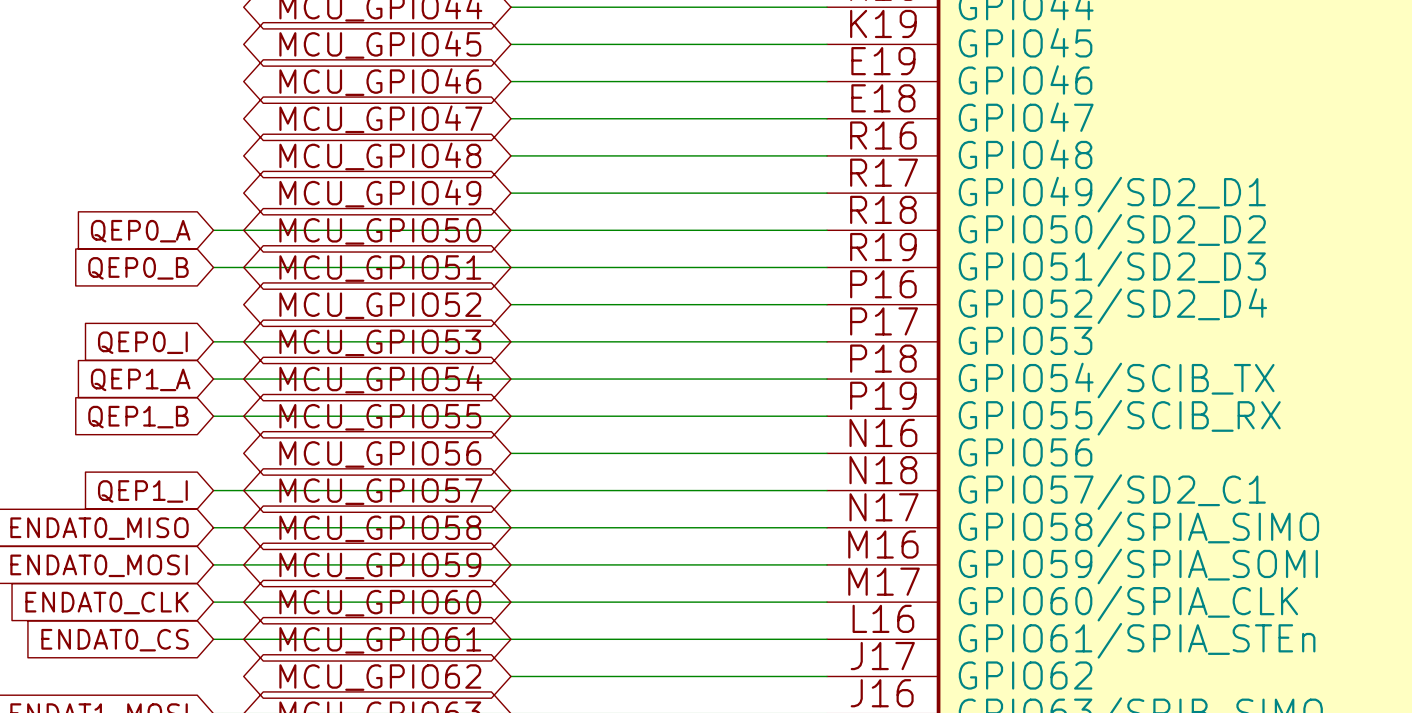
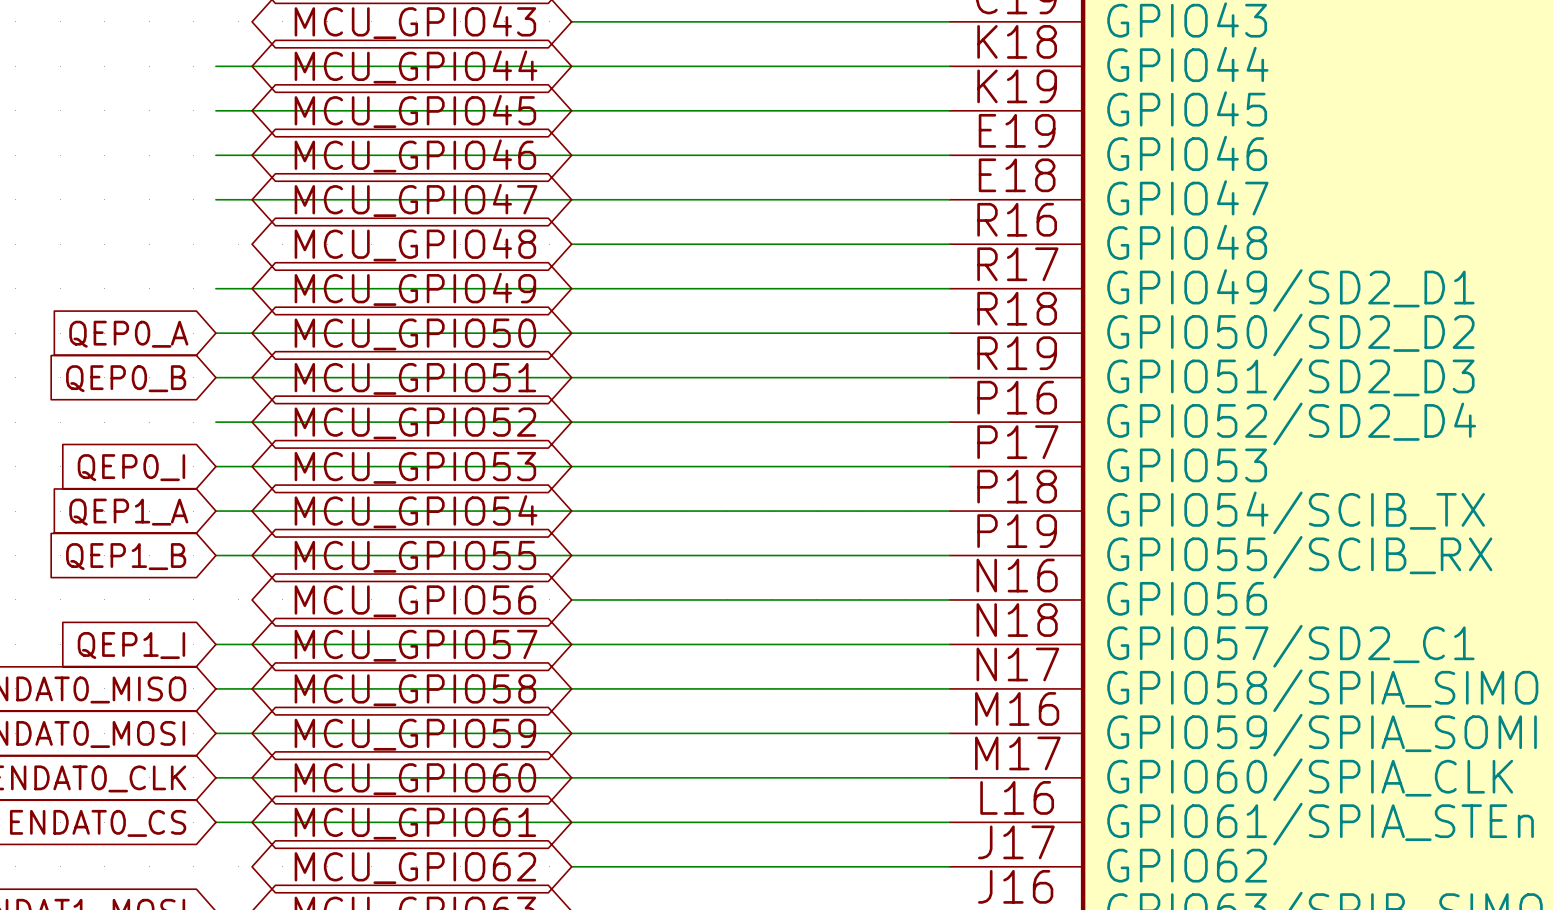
wire: none -> (215, 66) (571, 66)
wire: none -> (215, 110) (571, 110)
wire: none -> (215, 155) (571, 155)
wire: none -> (215, 199) (571, 199)
wire: none -> (215, 288) (571, 288)
wire: none -> (215, 422) (571, 422)

